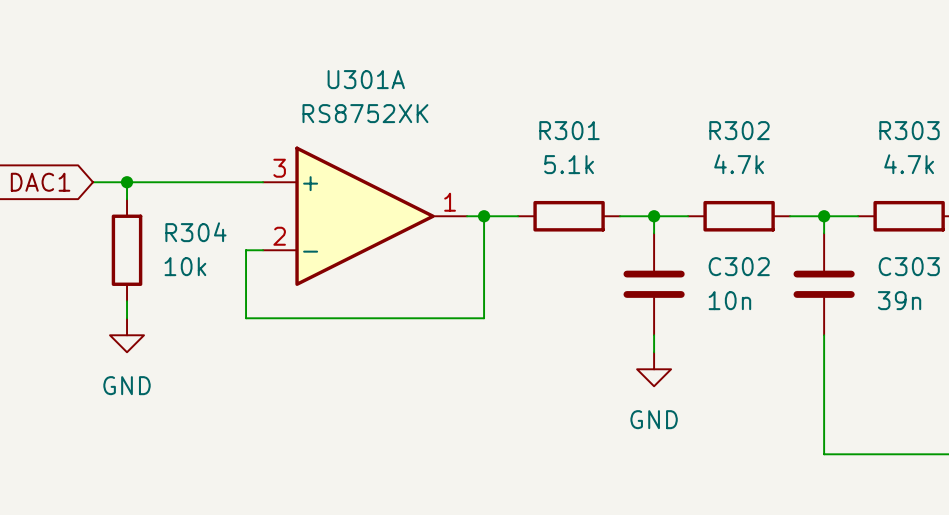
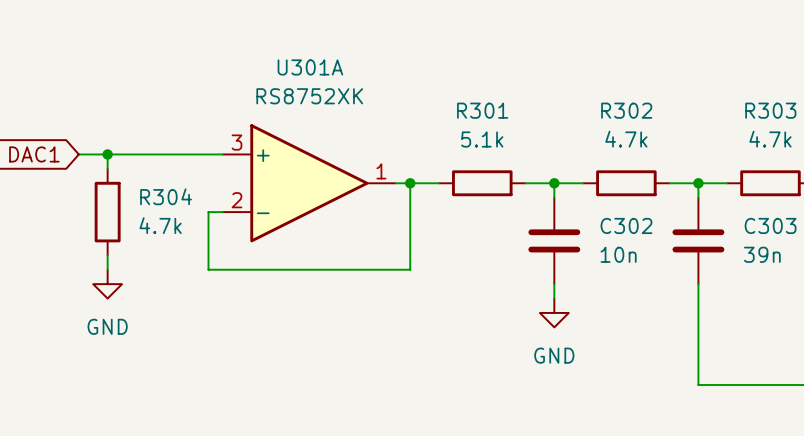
R304 value: 10k (185, 266) -> 4.7k (160, 225)

